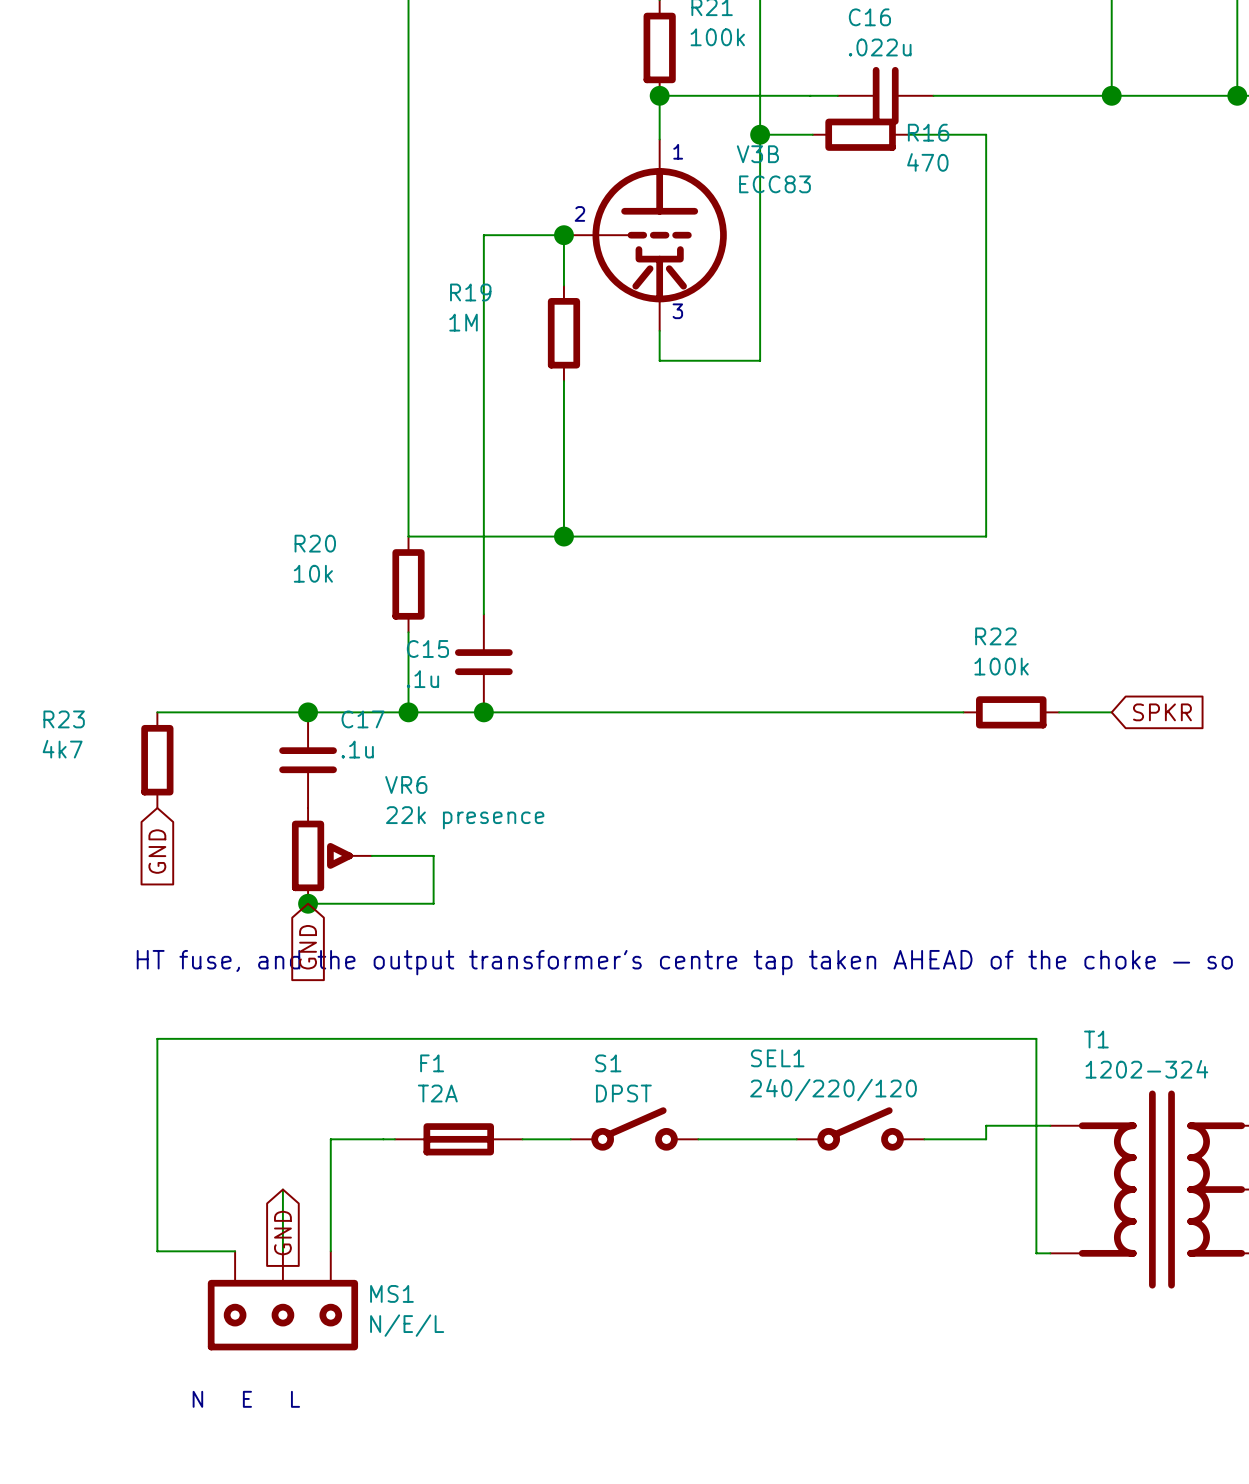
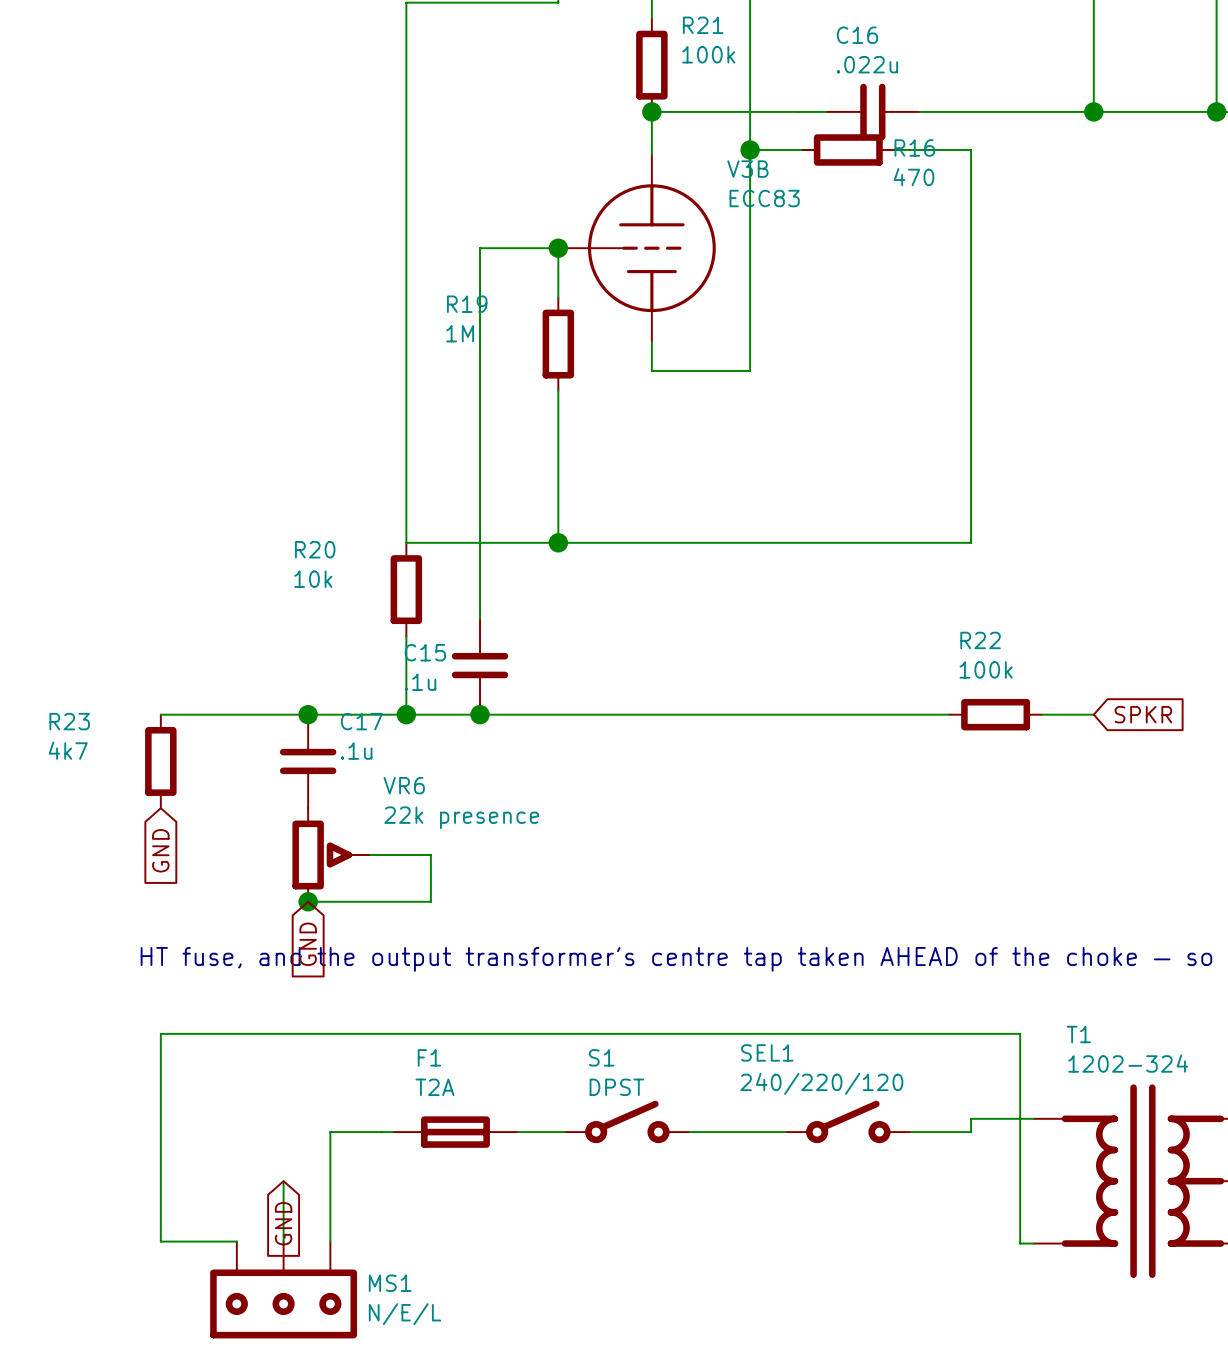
V3B symbol: [563, 139, 727, 331] -> [558, 154, 716, 342]
text: 1 (678, 151) -> none
text: 2 (579, 213) -> none
text: 3 (677, 311) -> none

